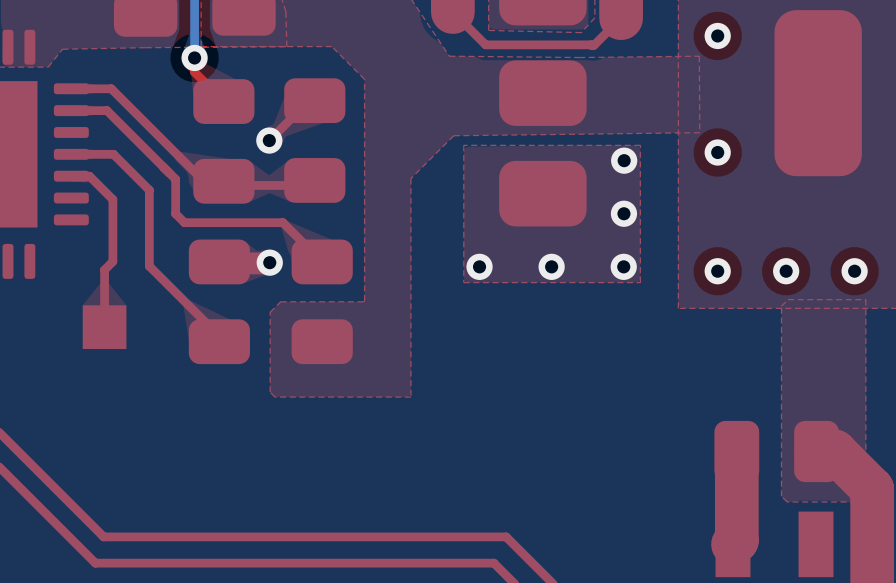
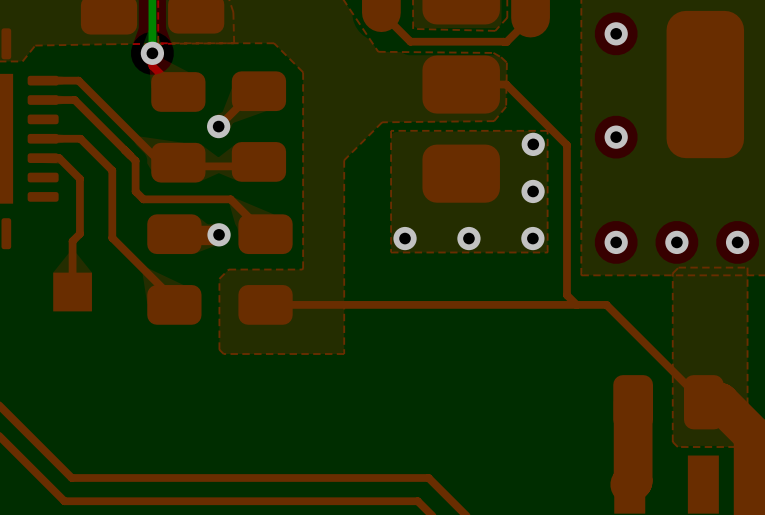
top zone outline: (579, 57) (699, 56) (699, 132) (453, 135) -> (493, 52) (506, 62) (506, 106) (494, 121) (382, 122)
top track: none -> (461, 84) (506, 84) (566, 145) (566, 295) (576, 304)
top track: none -> (265, 304) (606, 304) (703, 402)

